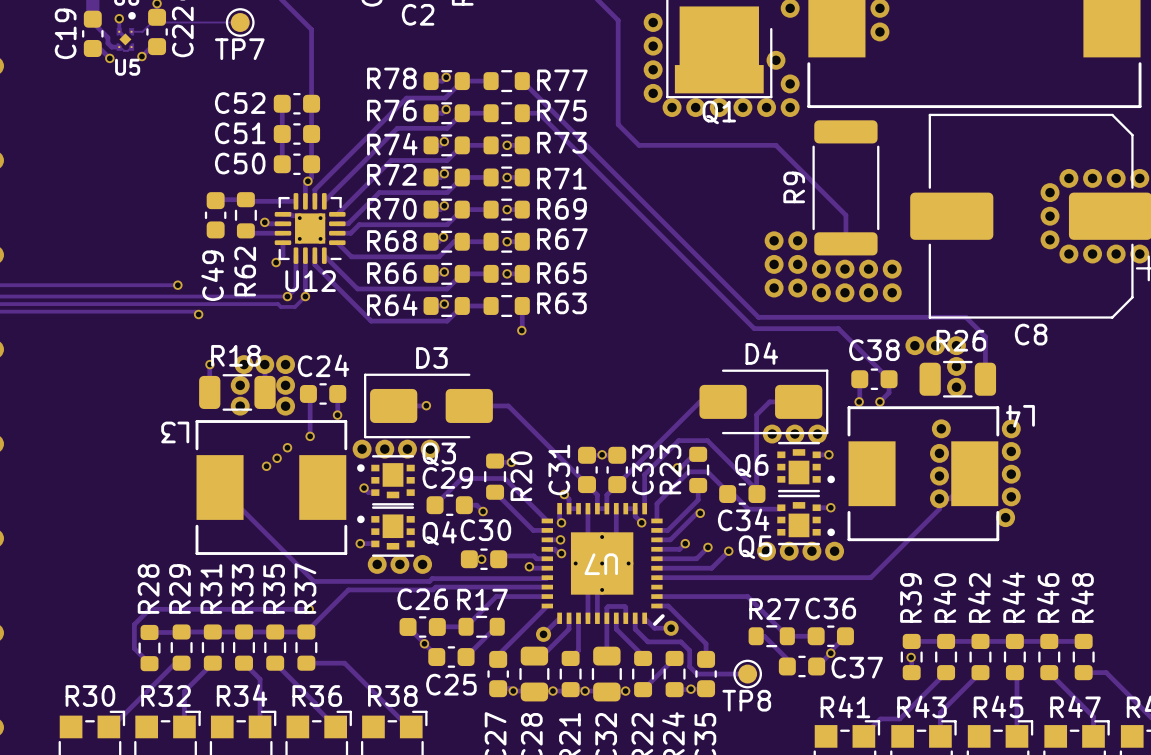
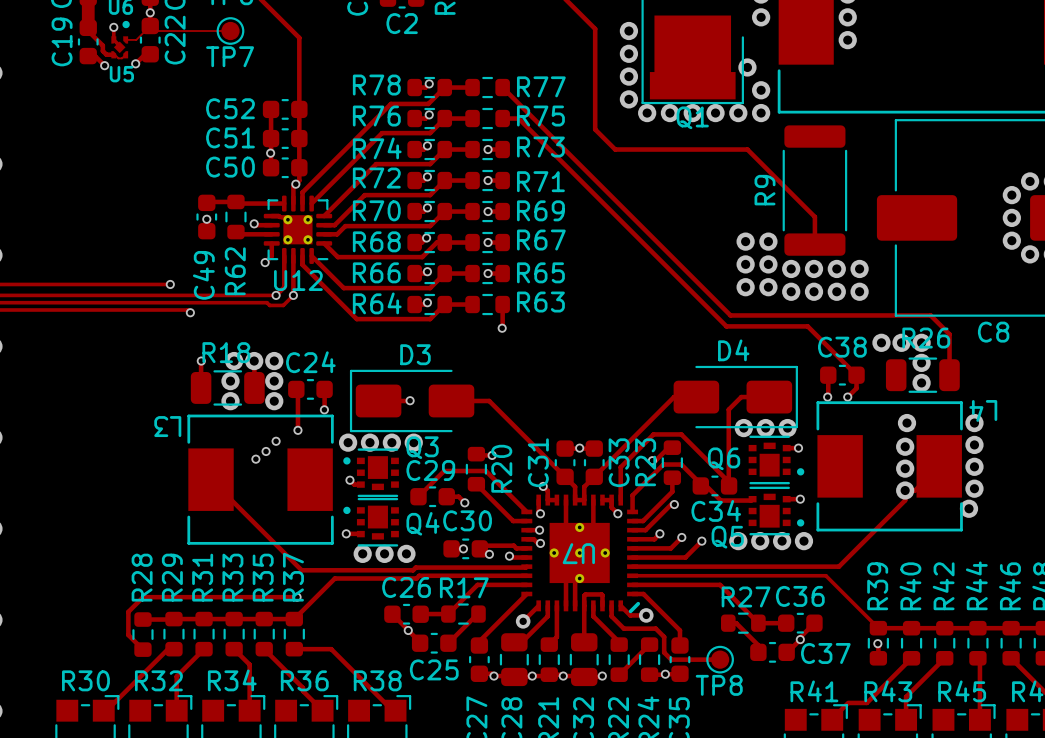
via: none -> (270, 153)
via: none -> (206, 219)
via: none -> (489, 554)
track: none -> (632, 575) (825, 575) (878, 628)

